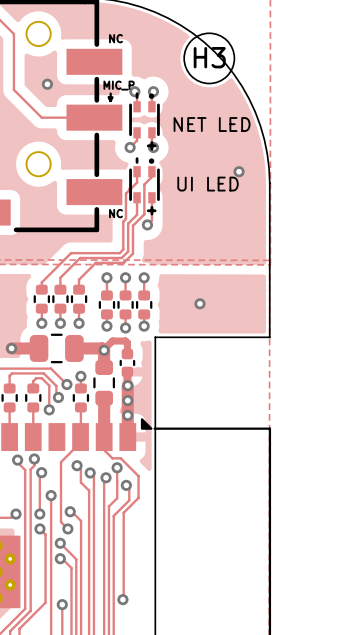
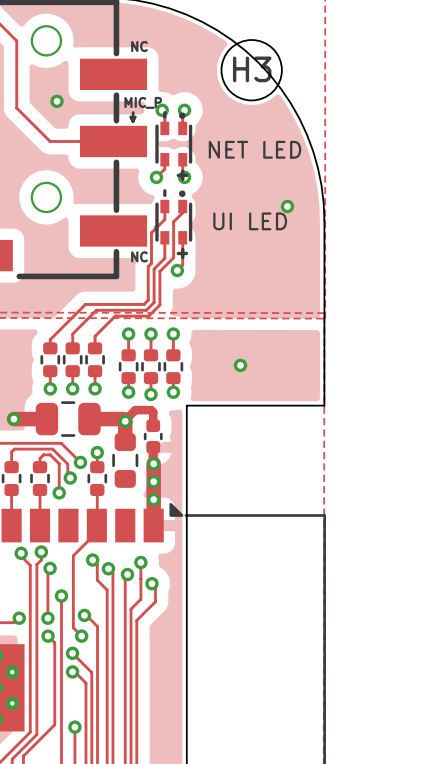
track: (104, 398) (104, 450) (112, 458) (120, 458) (138, 476) (138, 497) (123, 512) (122, 599) -> none
via: (122, 599) -> none

